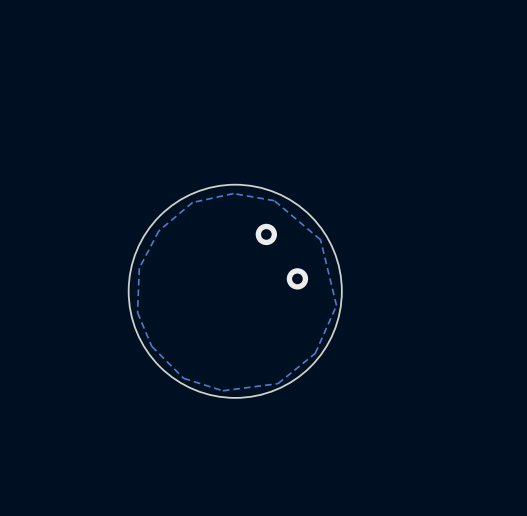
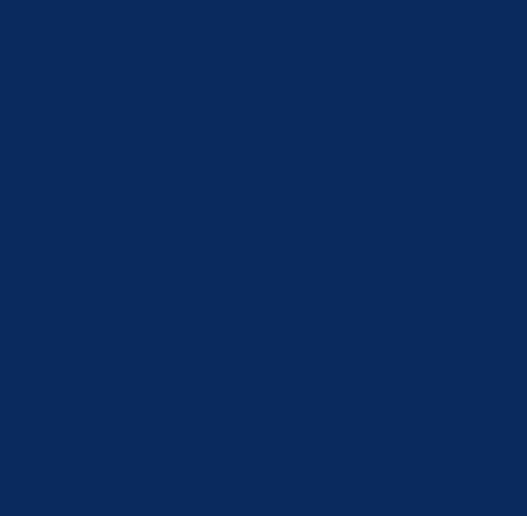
round board edge: [127, 183, 343, 399] -> none
zone outline: (233, 193) (274, 200) (320, 239) (336, 305) (315, 353) (277, 383) (222, 390) (183, 378) (151, 346) (137, 312) (139, 268) (158, 230) (192, 202) (233, 193) -> none
via: (266, 234) -> none
via: (297, 278) -> none

